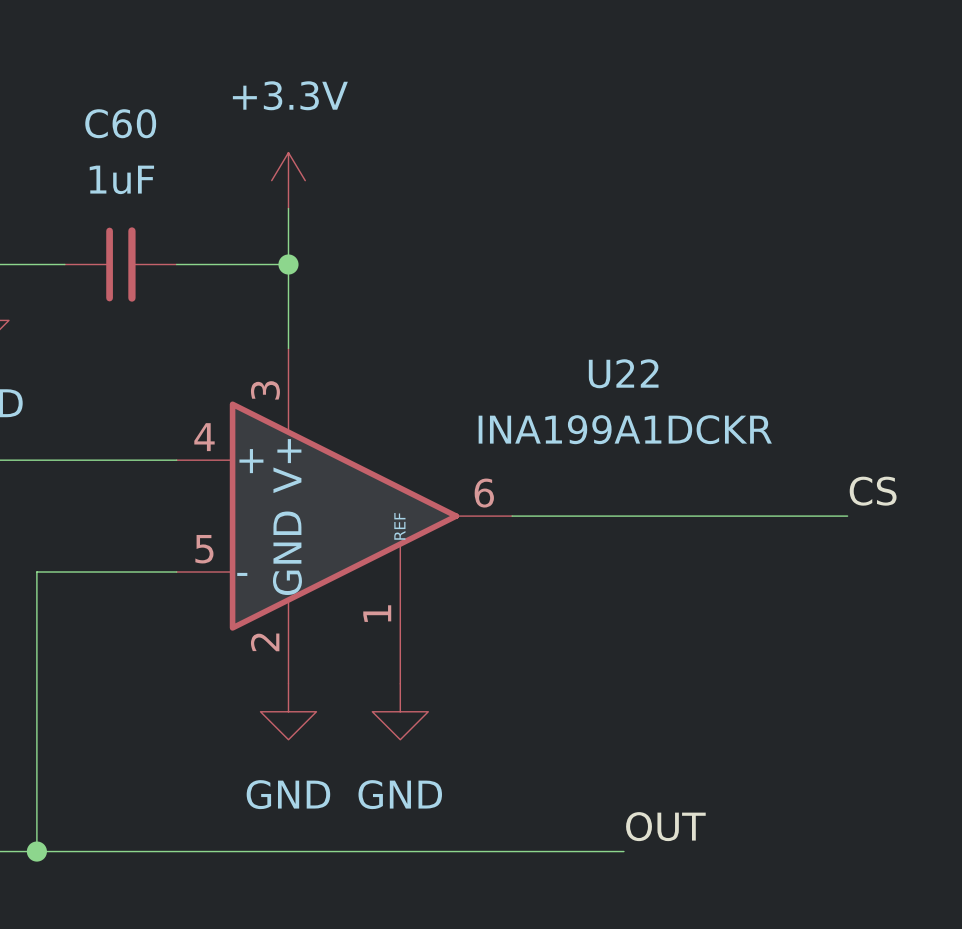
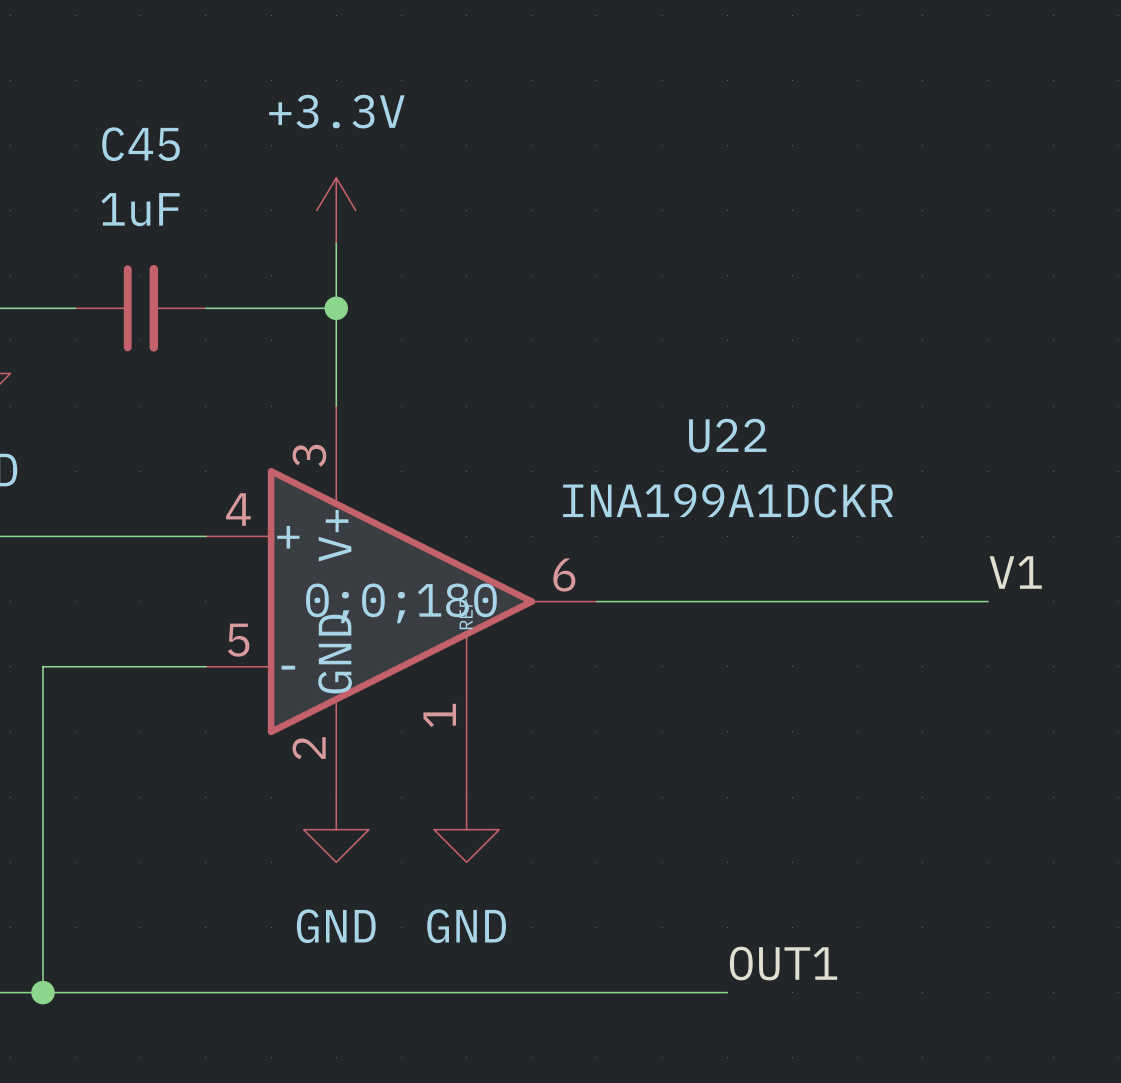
C60 name: C60 (120, 123) -> C45 (140, 144)
label: CS (873, 491) -> V1 (1015, 572)
U22 text: none -> 0;0;180 (401, 603)
label: OUT (665, 826) -> OUT1 (783, 963)

